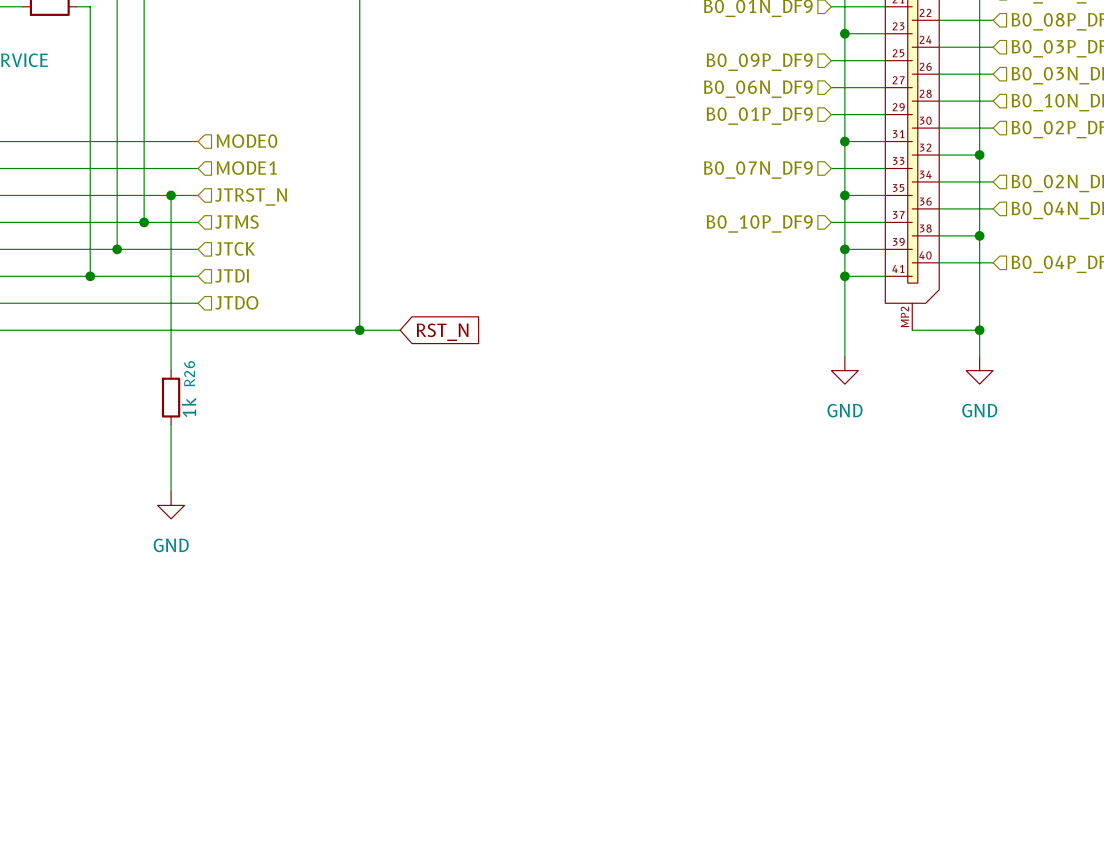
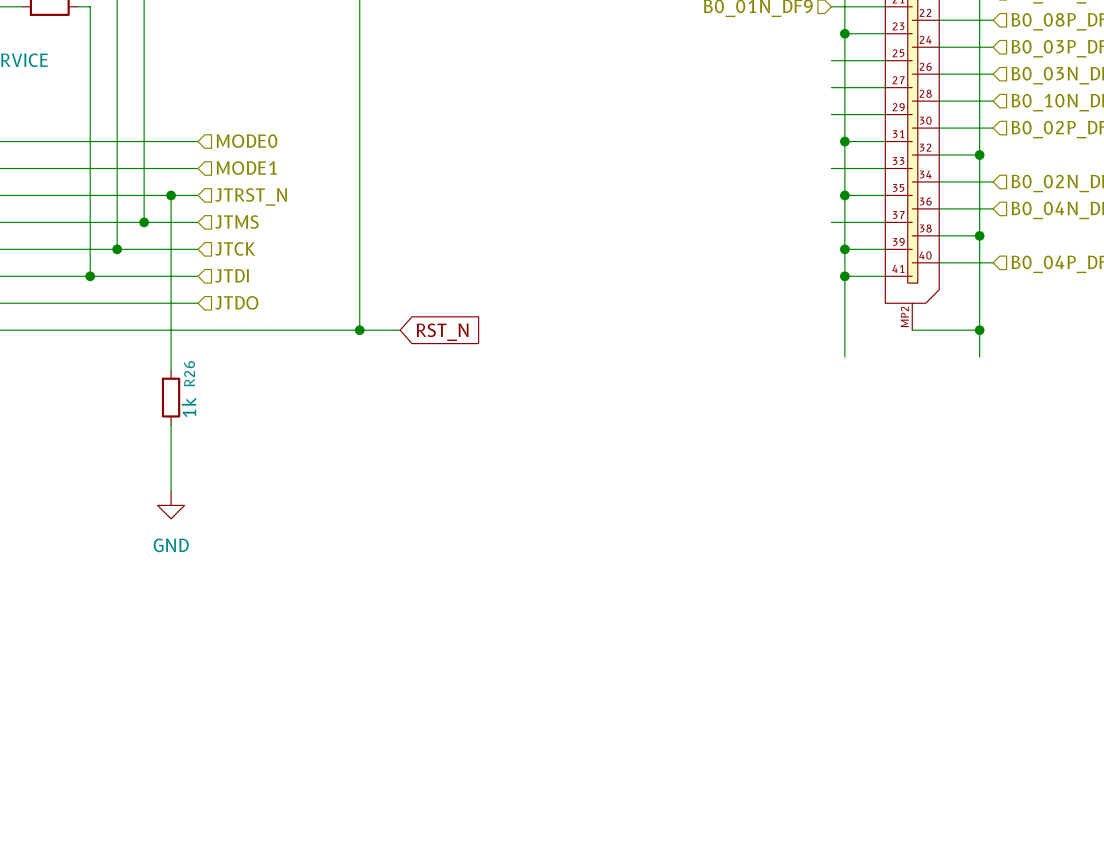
hierarchical label: B0_09P_DF9 (759, 62) -> none
hierarchical label: B0_06N_DF9 (758, 89) -> none
hierarchical label: B0_01P_DF9 (759, 116) -> none
hierarchical label: B0_07N_DF9 (758, 170) -> none
hierarchical label: B0_10P_DF9 (759, 223) -> none
power symbol: GND (844, 370) -> none
power symbol: GND (979, 370) -> none

